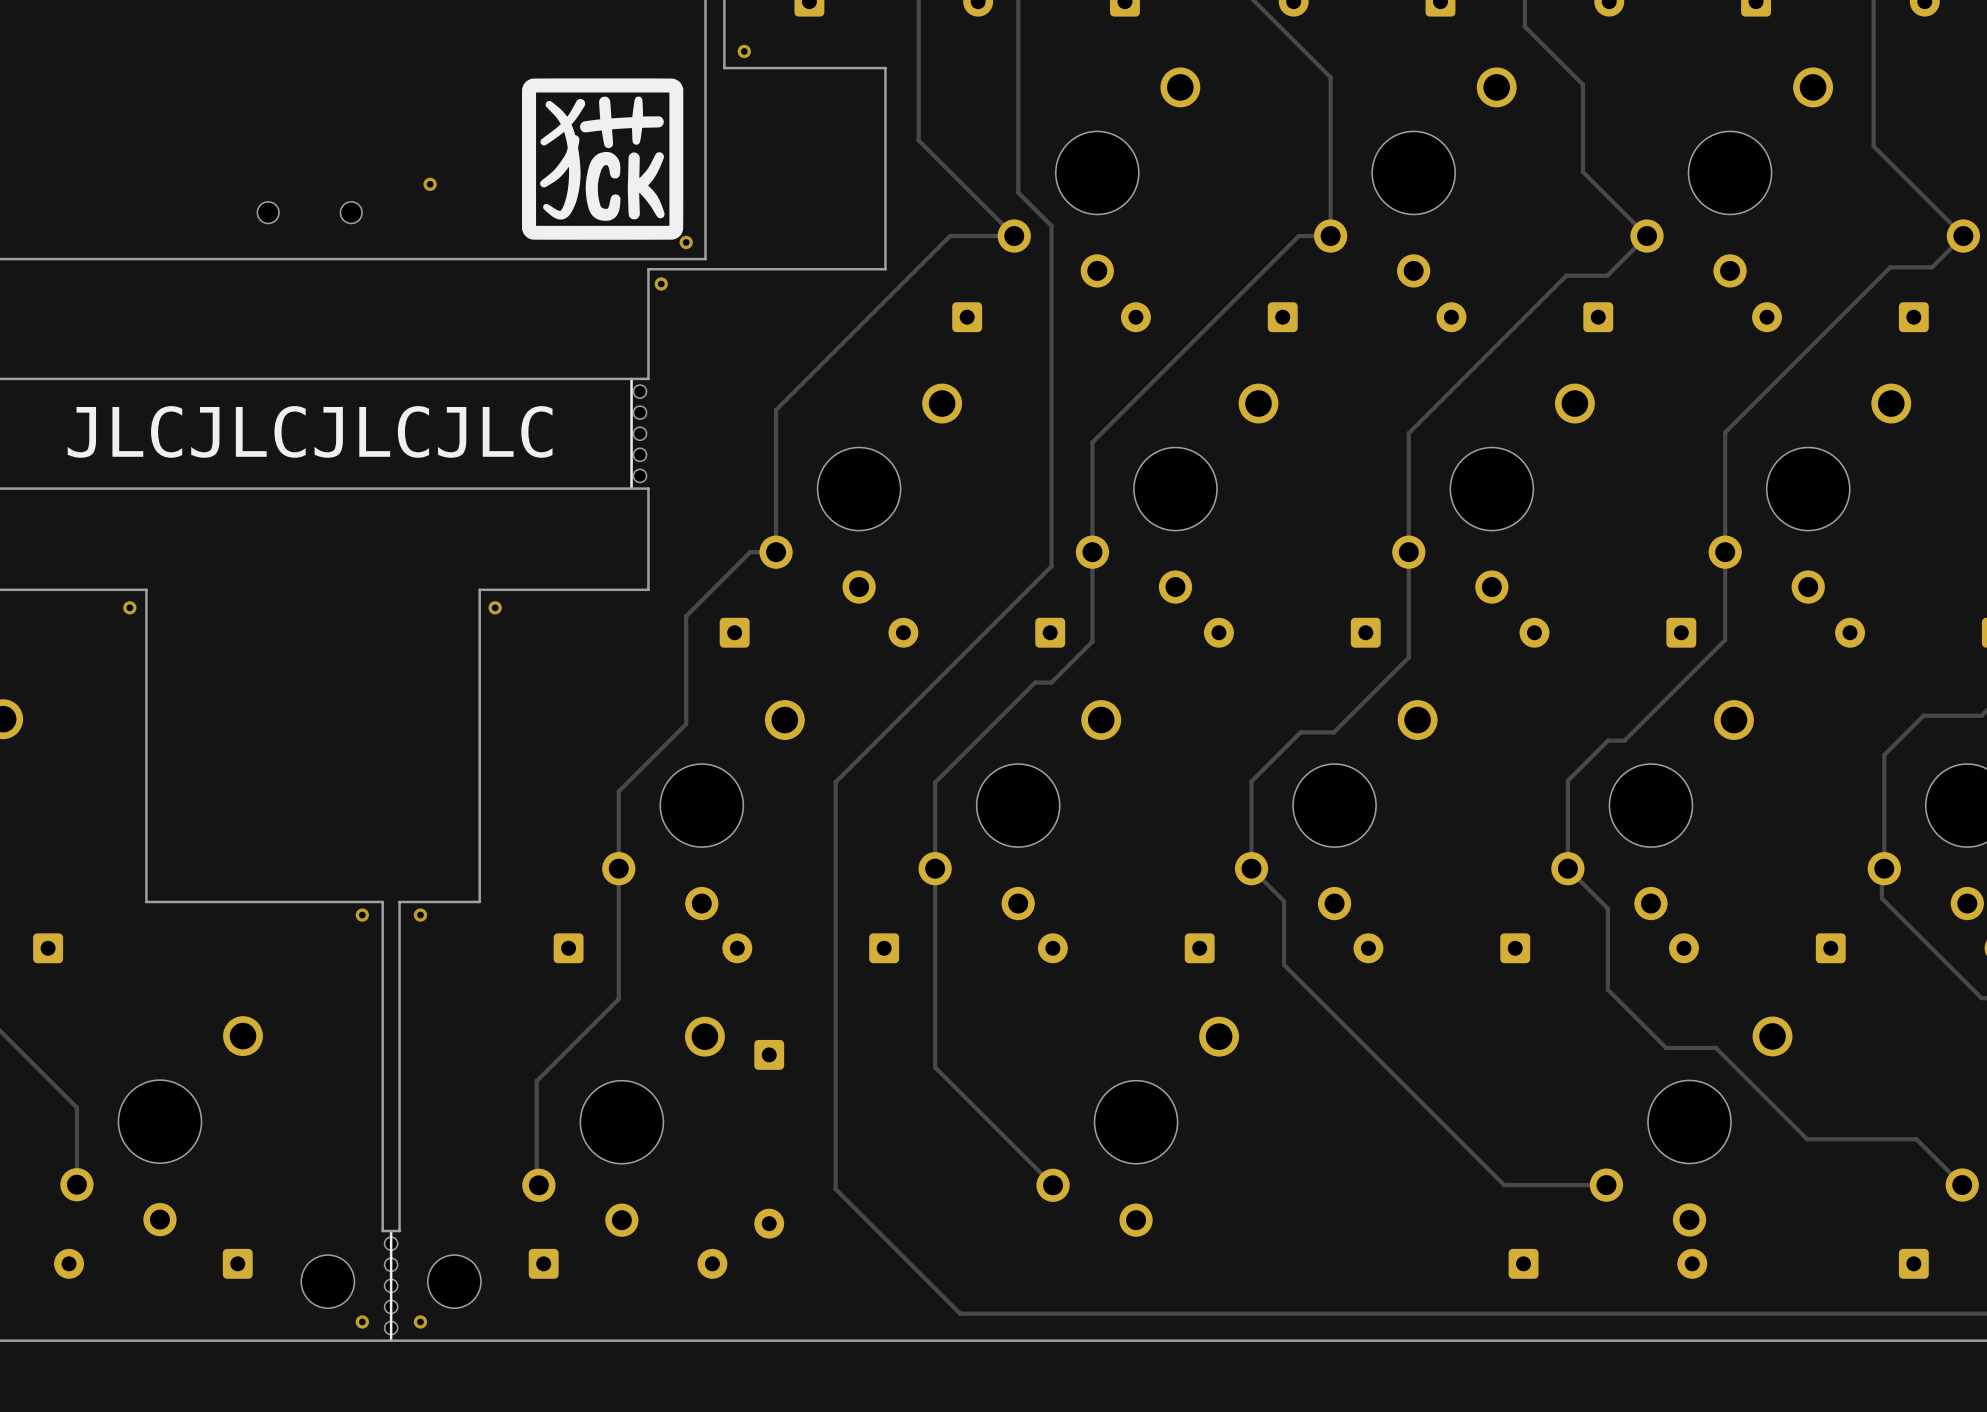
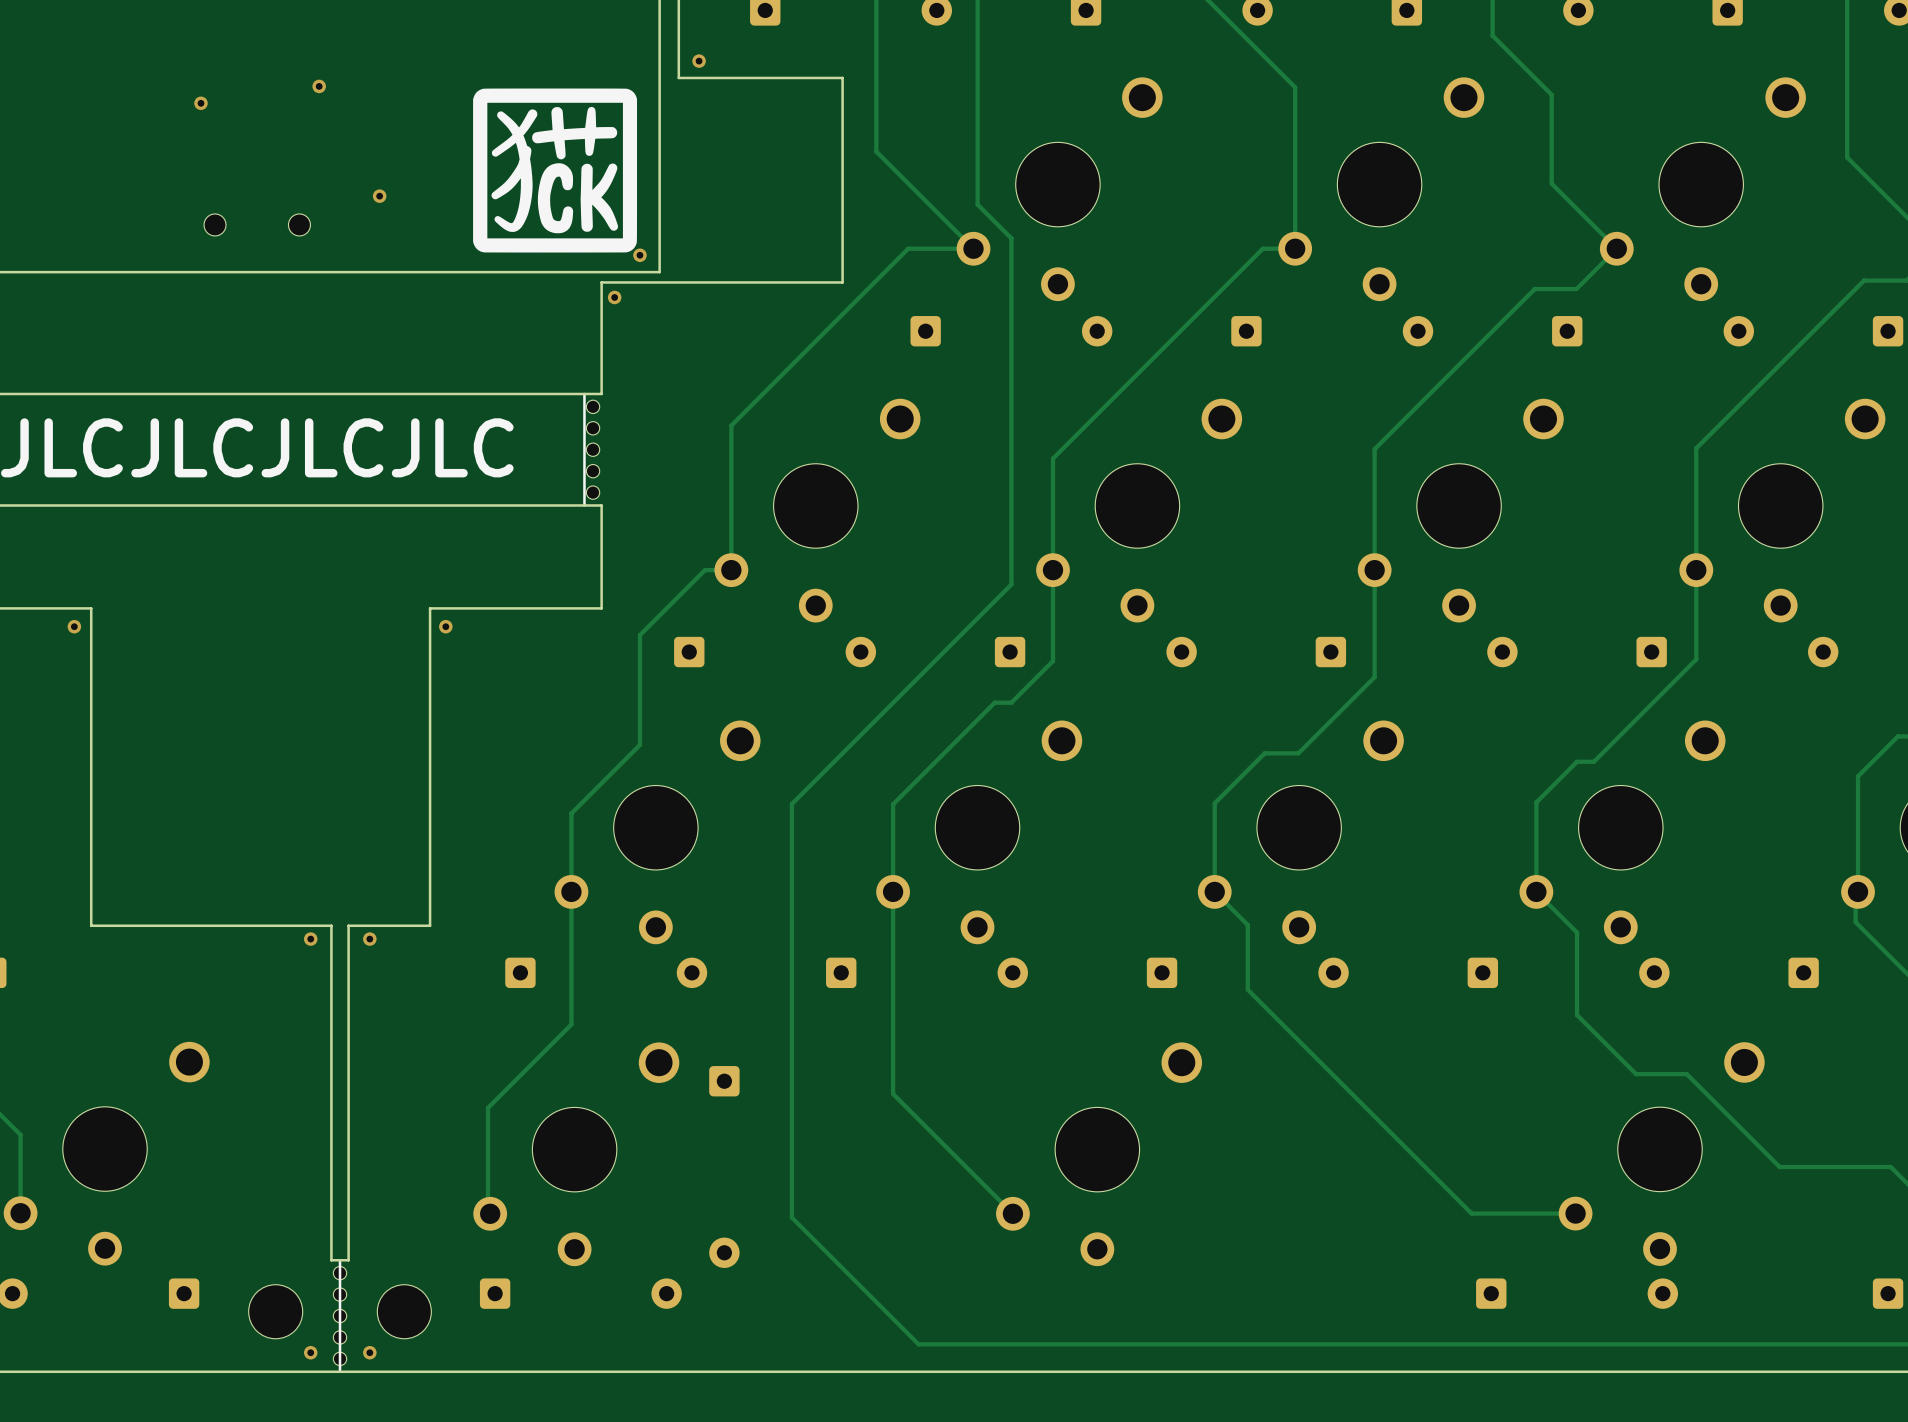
via: none -> (319, 86)
via: none -> (200, 103)

